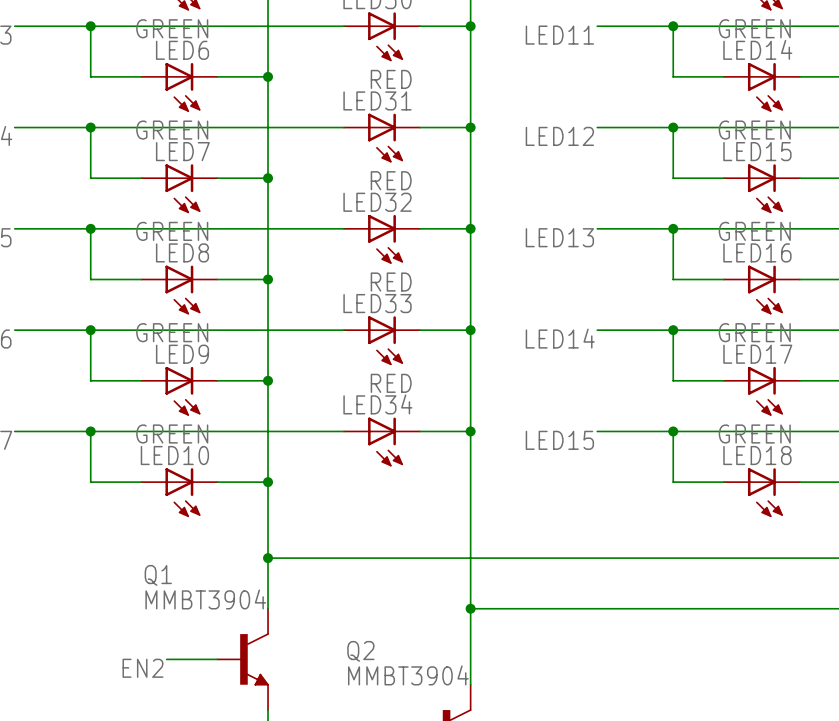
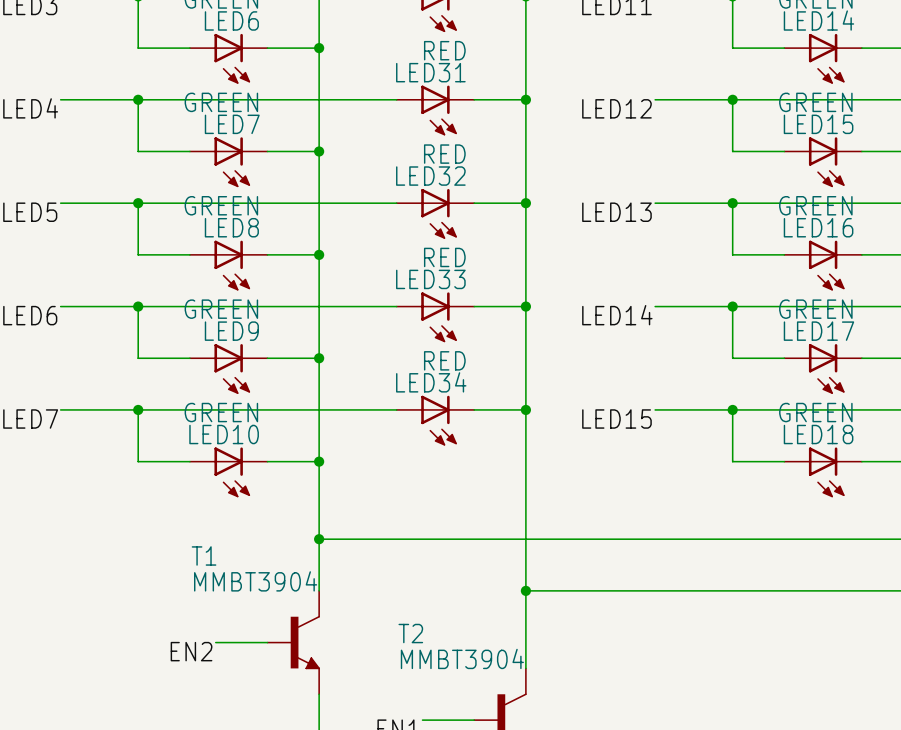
Q1 name: Q1 (158, 575) -> T1 (204, 555)
Q2 name: Q2 (360, 651) -> T2 (410, 633)

